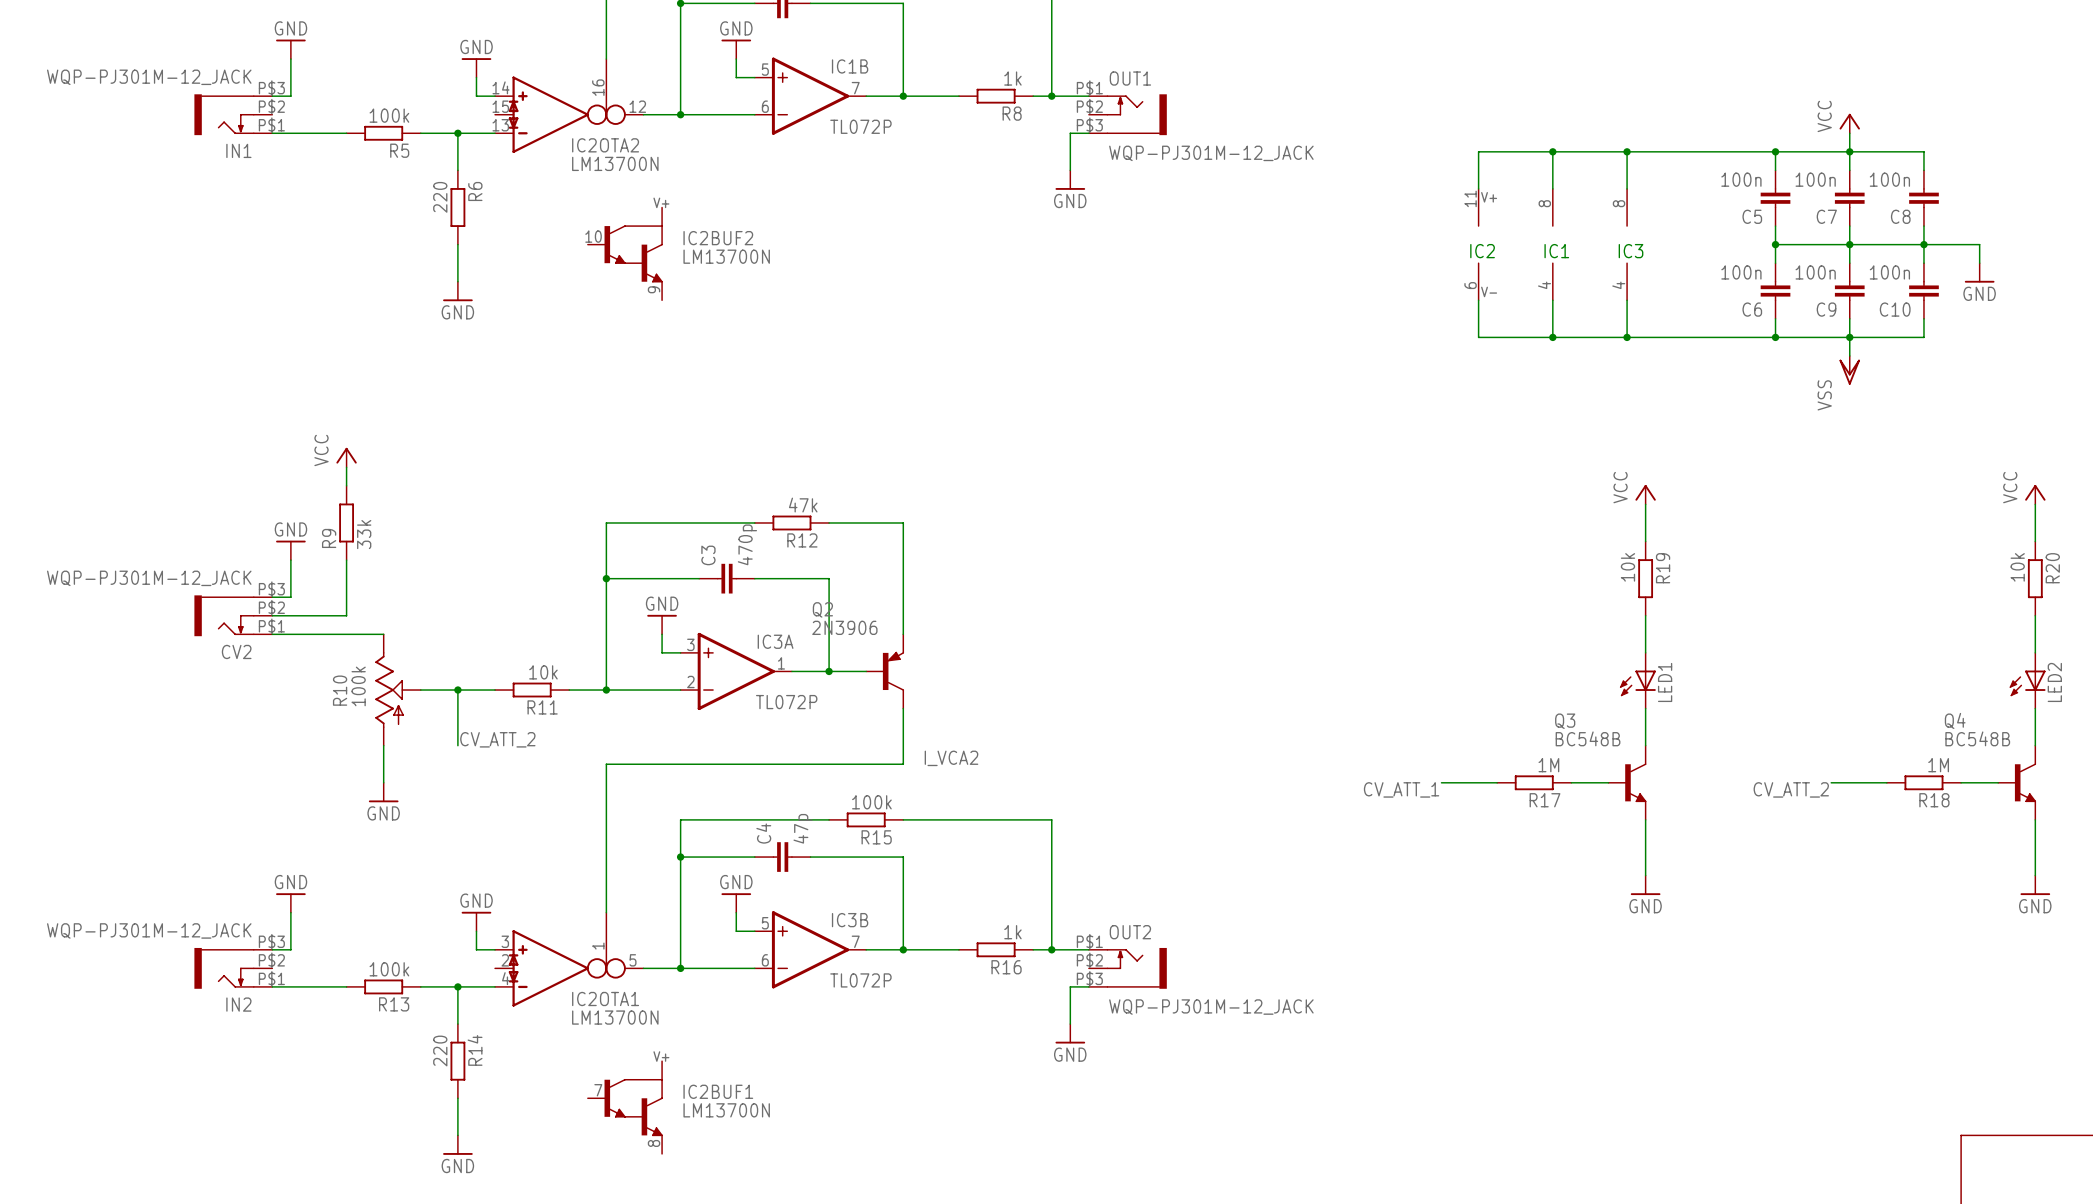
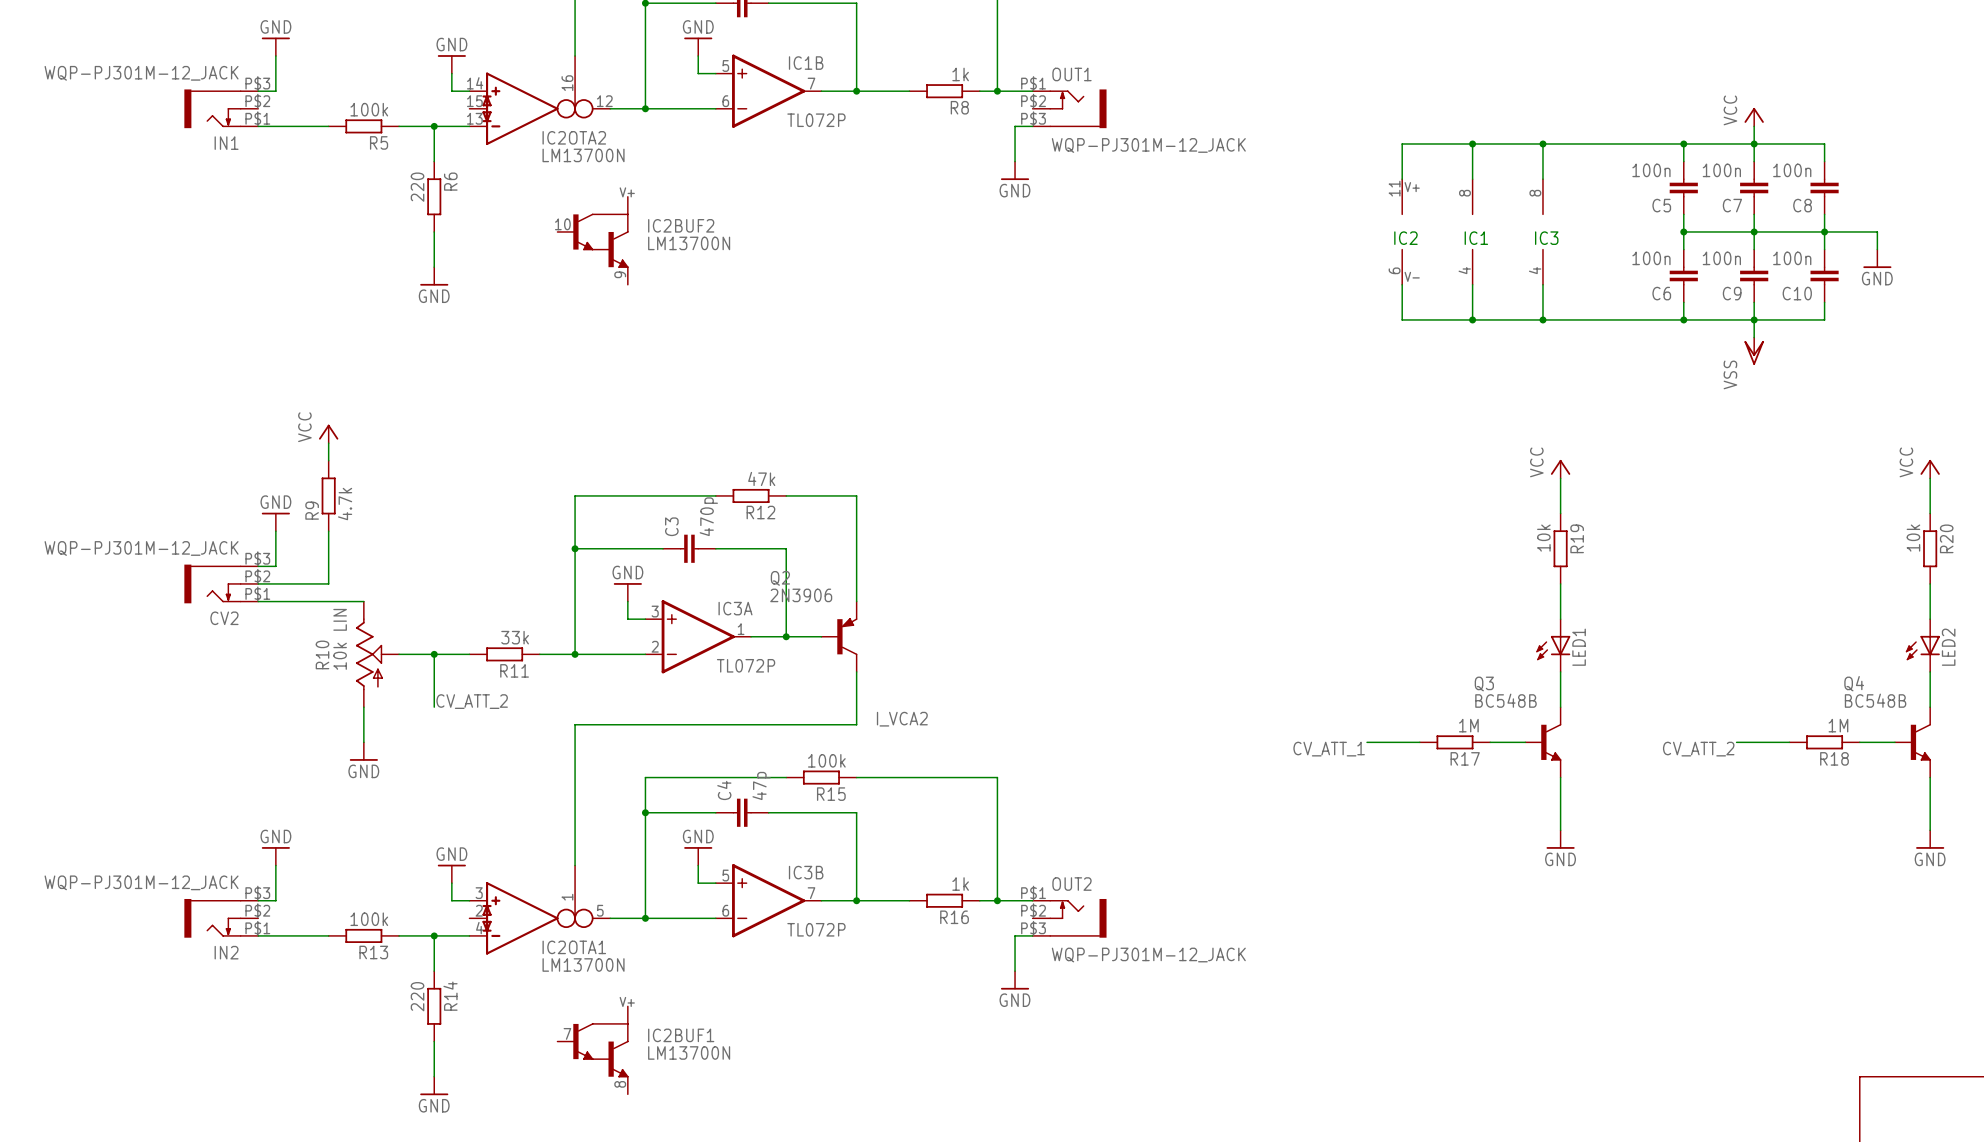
R9 value: 33k (364, 534) -> 4.7k (345, 504)
R11 value: 10k (543, 672) -> 33k (515, 637)
R10 value: 100k (358, 686) -> 10k LIN (340, 639)

